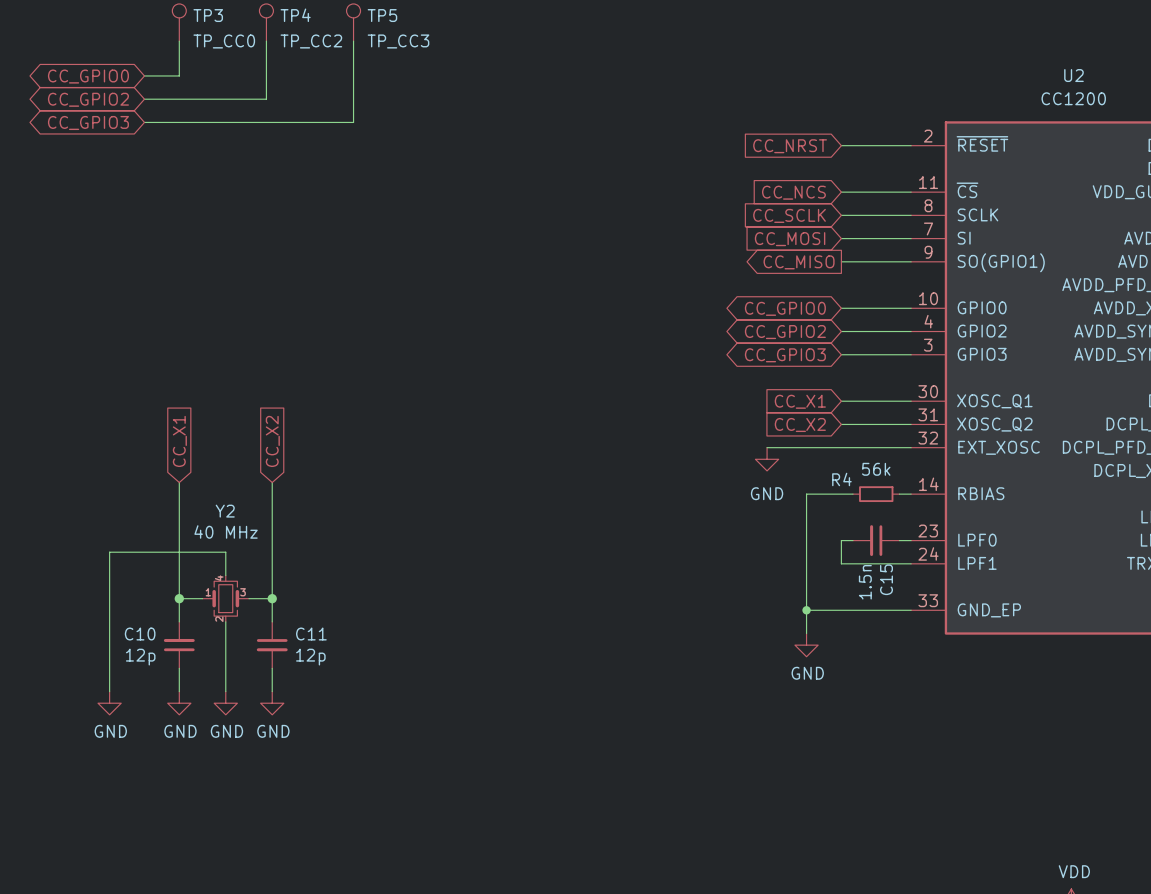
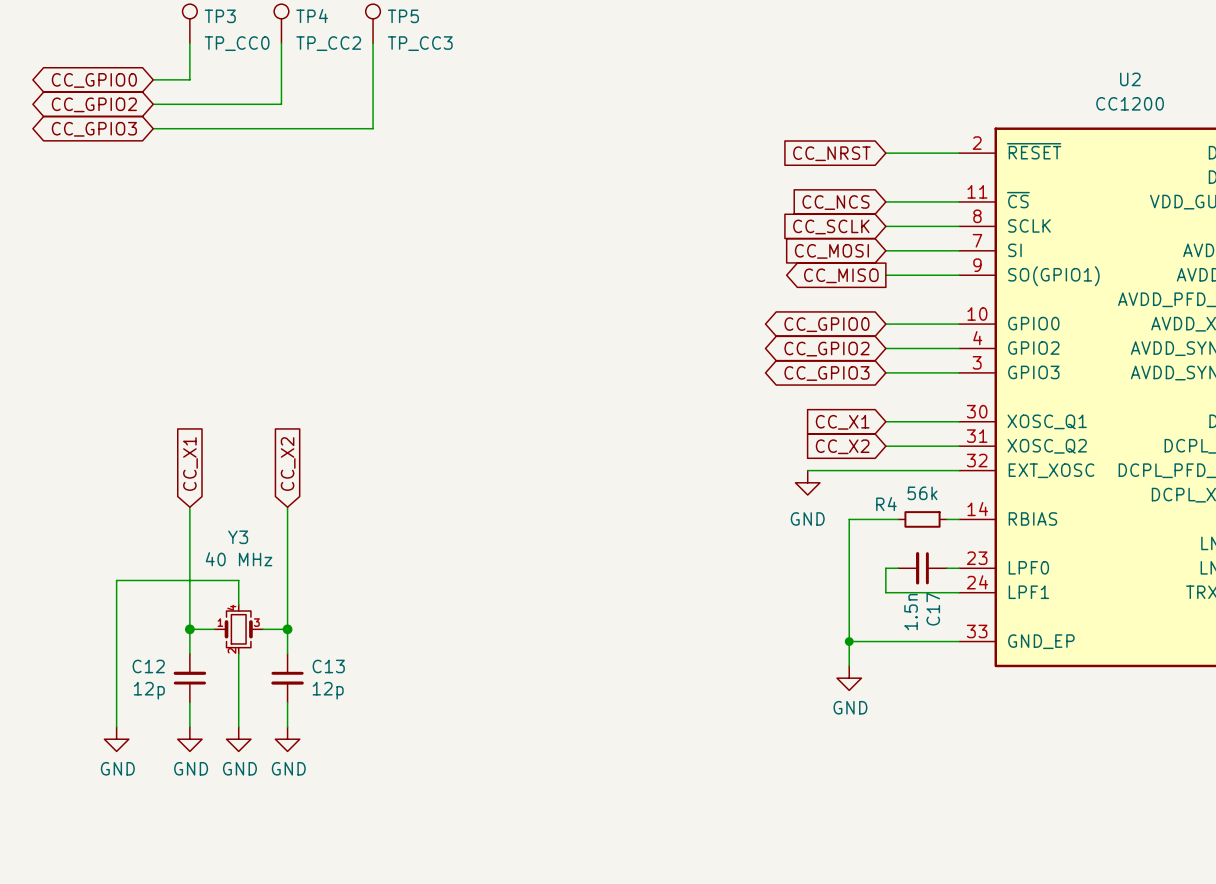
Y2 name: Y2 (225, 511) -> Y3 (238, 537)
C15 name: C15 (886, 579) -> C17 (933, 609)
C10 name: C10 (140, 634) -> C12 (148, 666)
C11 name: C11 (311, 634) -> C13 (328, 666)

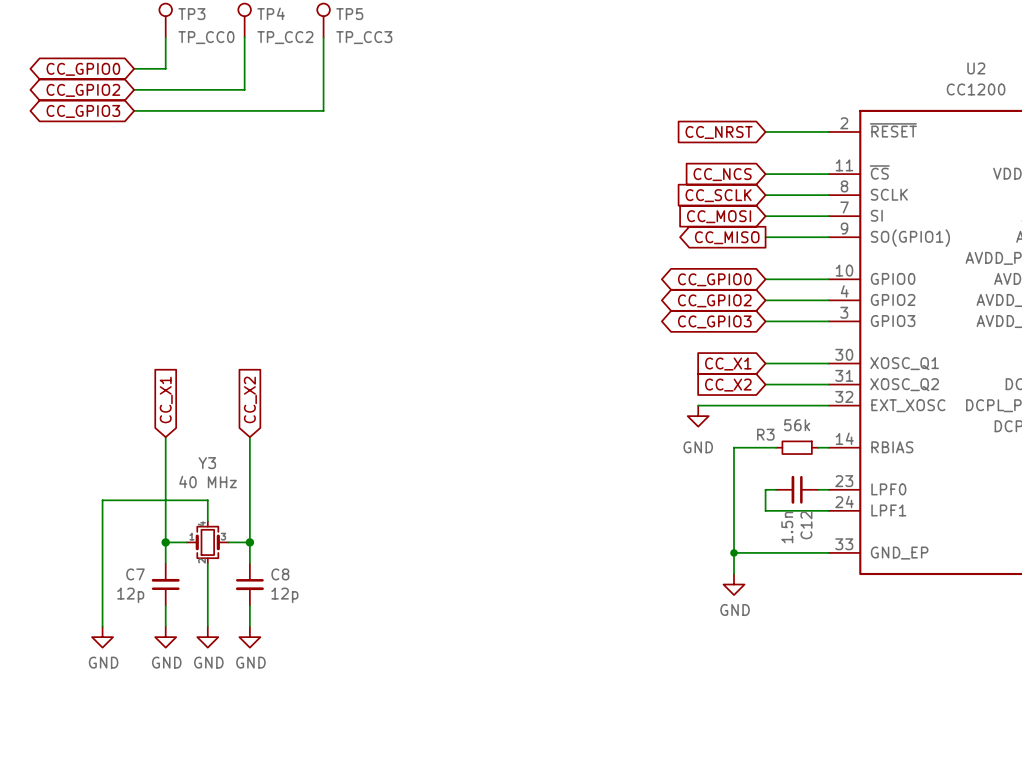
R4 name: R4 (886, 504) -> R3 (765, 434)
C17 name: C17 (933, 609) -> C12 (806, 525)
C12 name: C12 (148, 666) -> C7 (135, 574)
C13 name: C13 (328, 666) -> C8 (280, 574)

